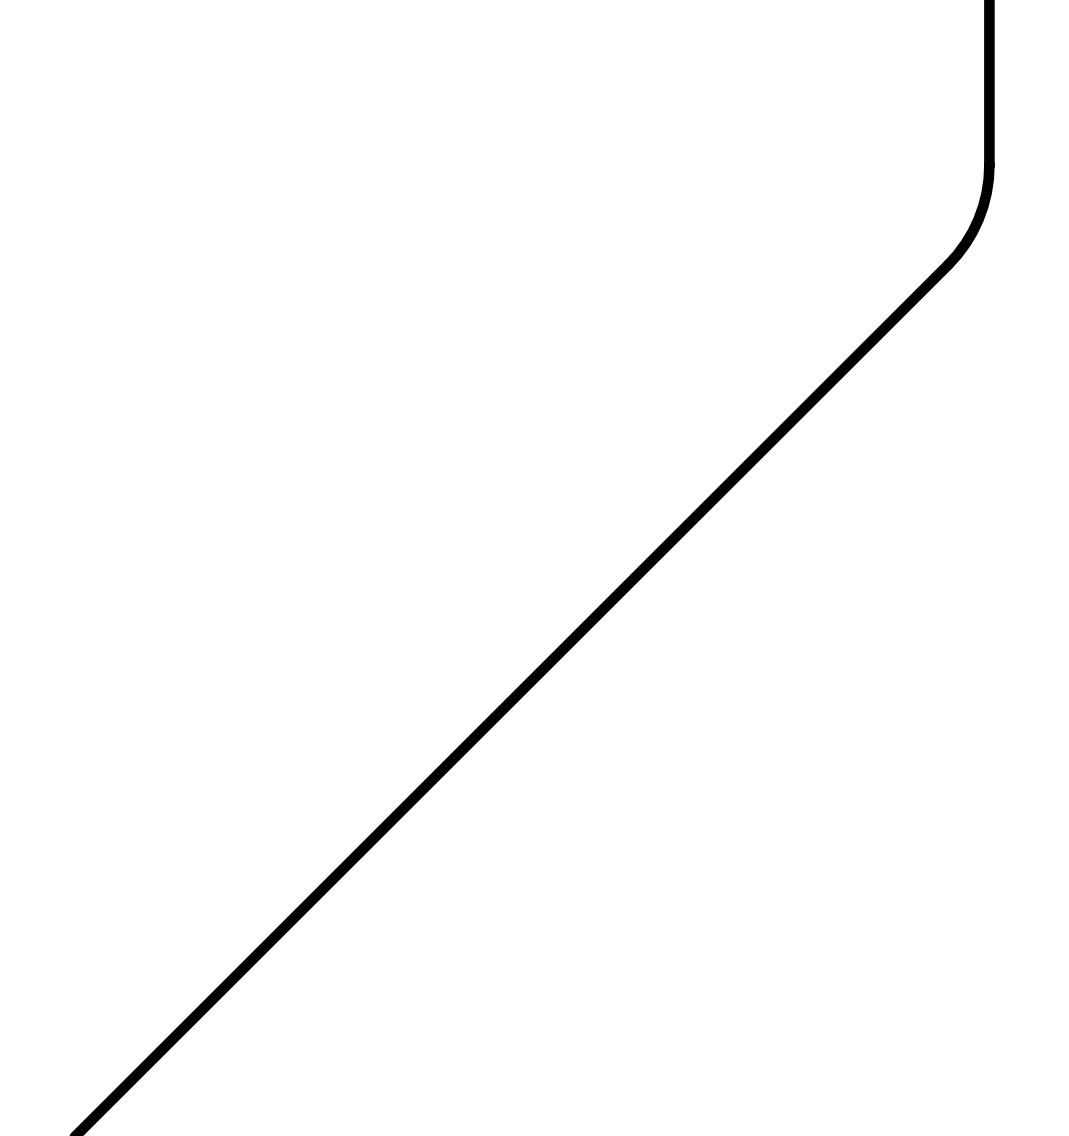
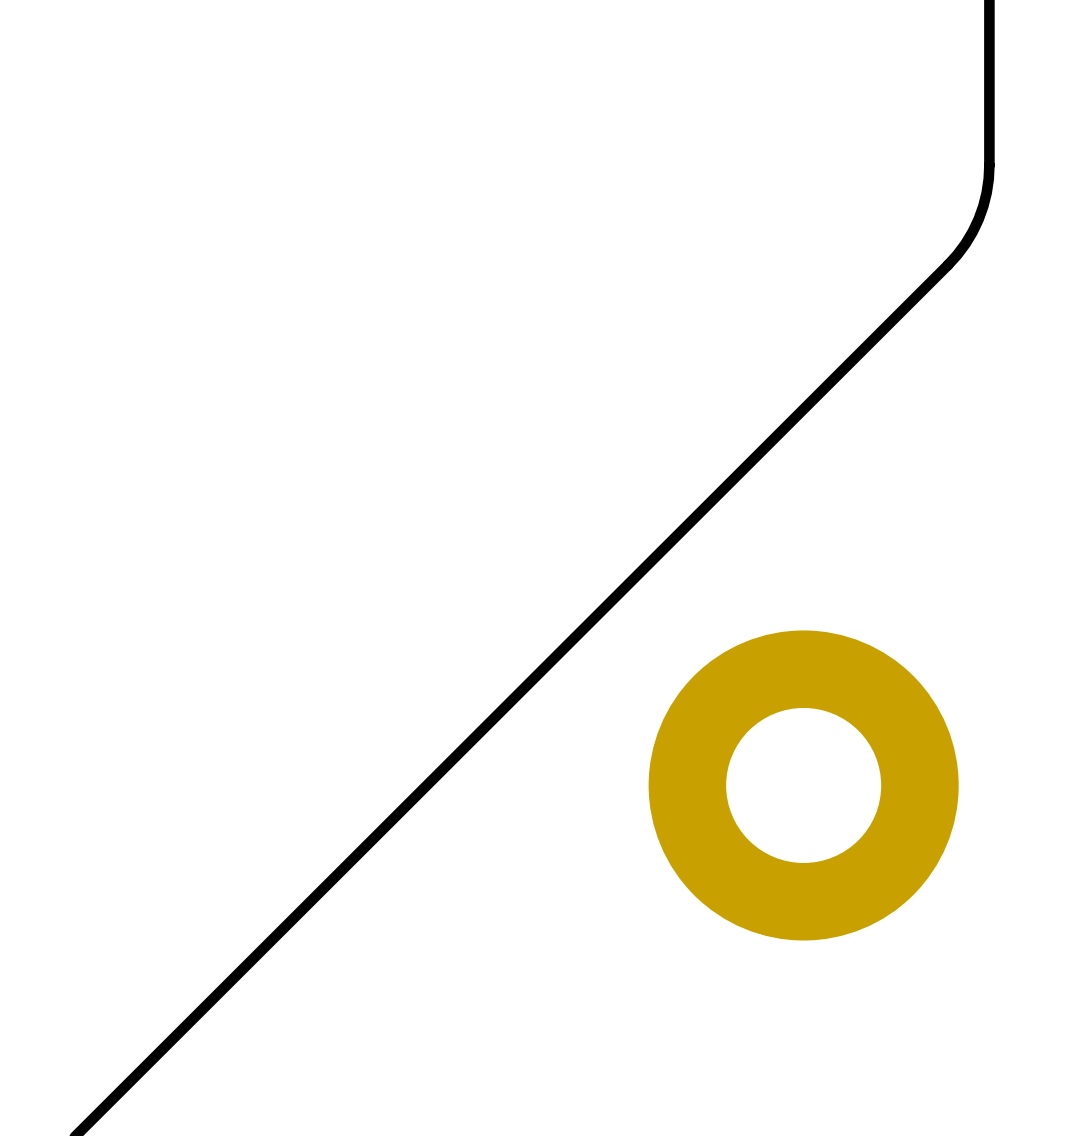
part: none -> (803, 785)

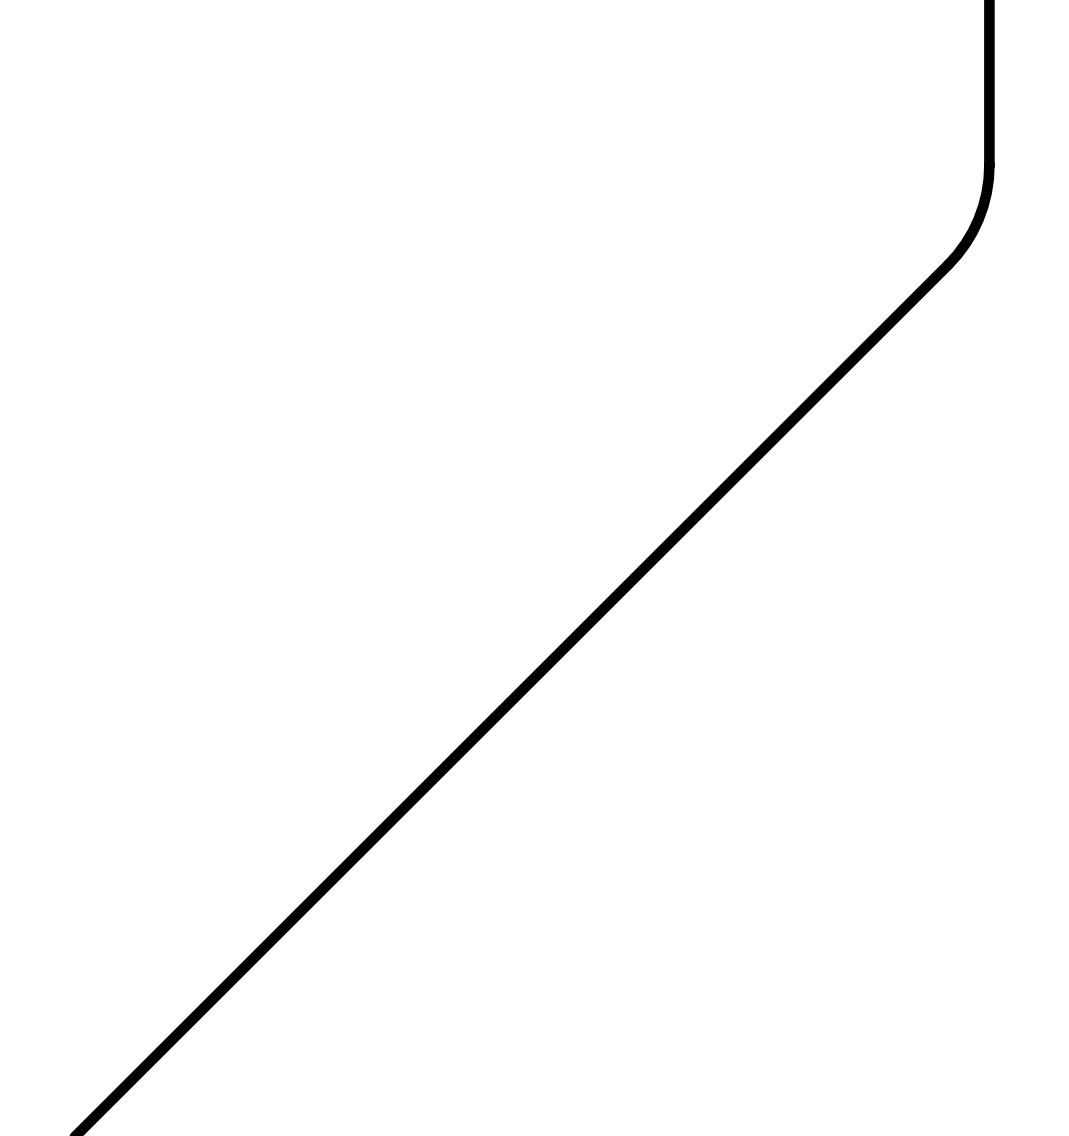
part: (803, 785) -> none

